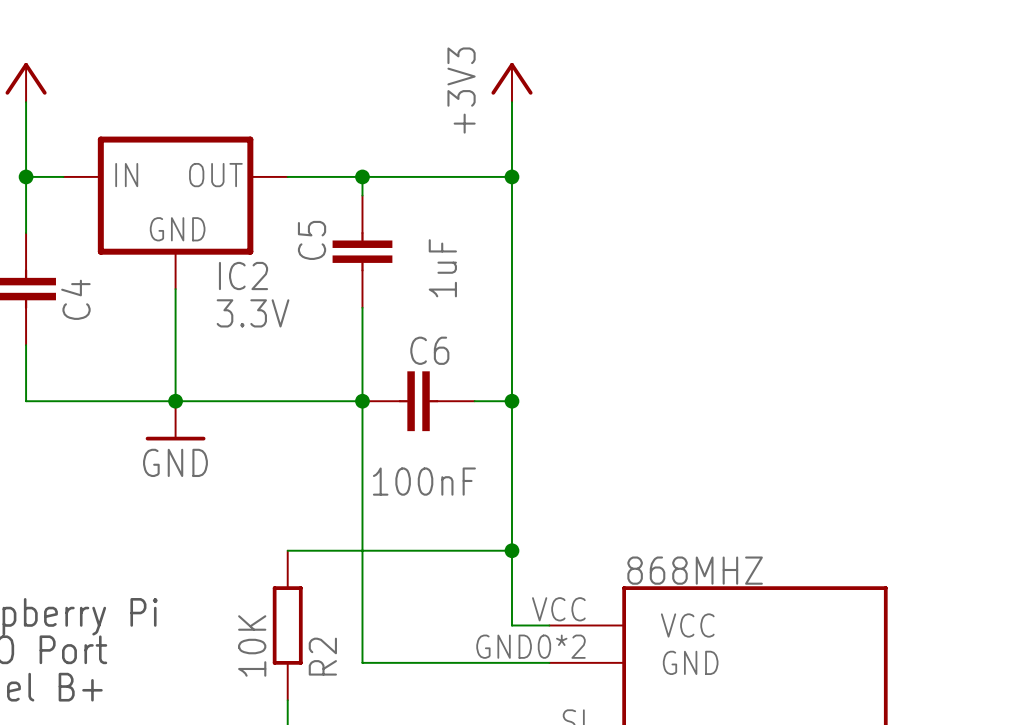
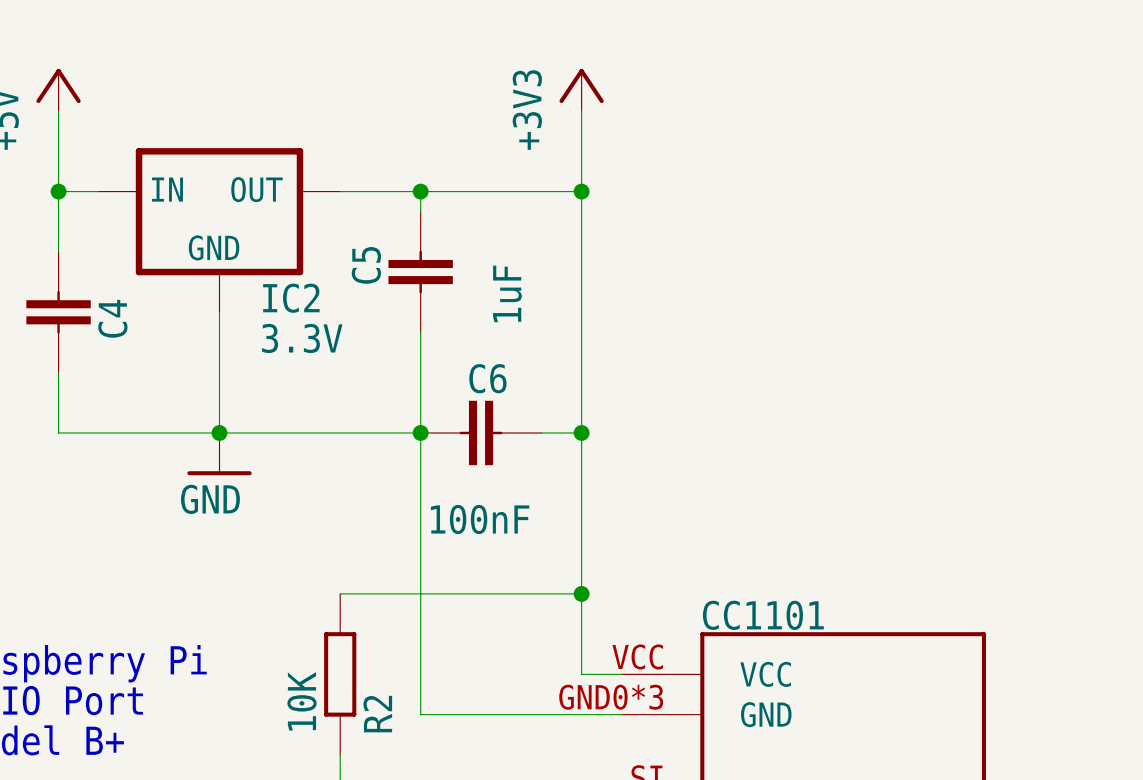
868MHZ name: 868MHZ (695, 570) -> CC1101 (763, 615)
868MHZ pin number: GND0*2 (530, 646) -> GND0*3 (611, 697)

